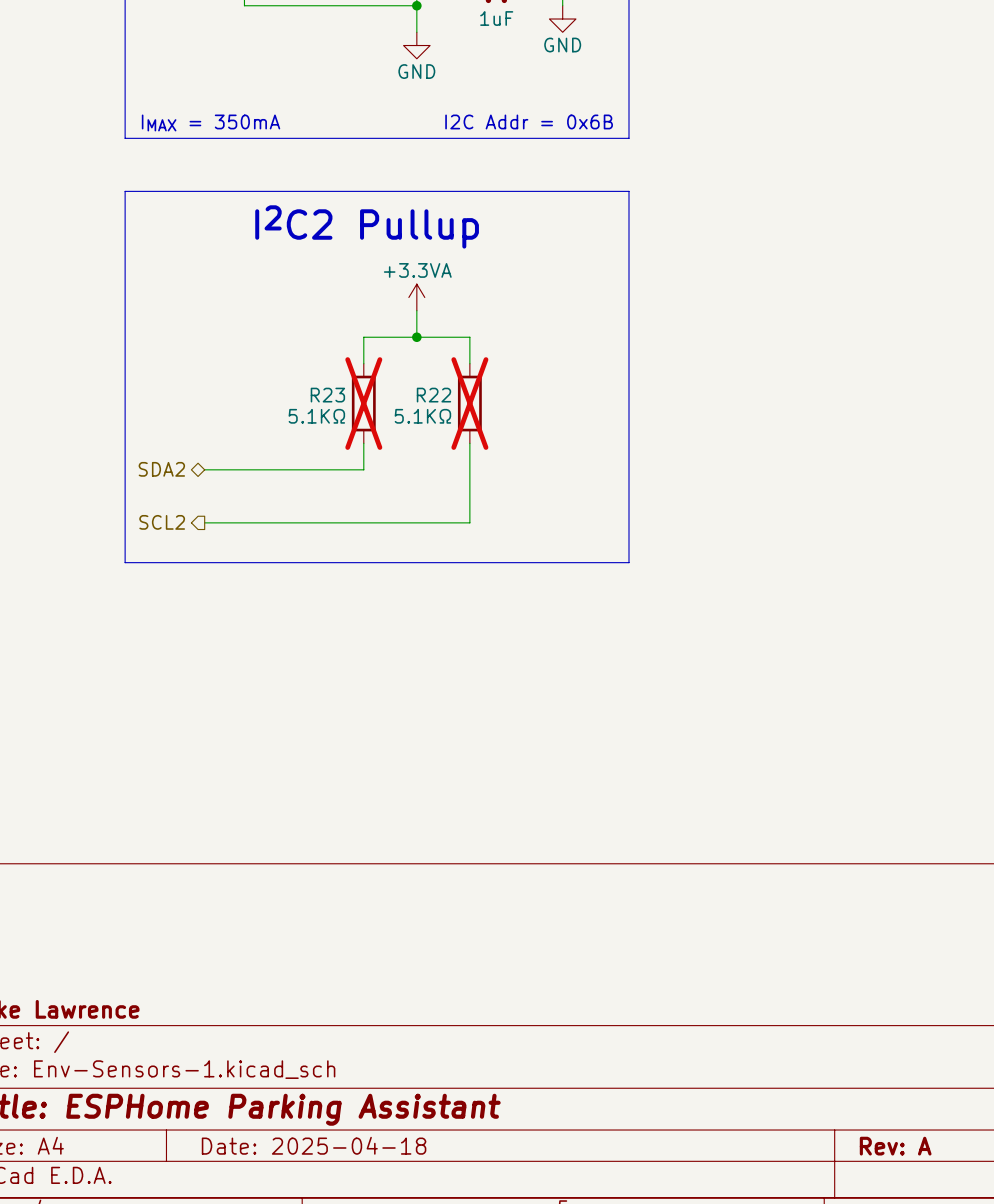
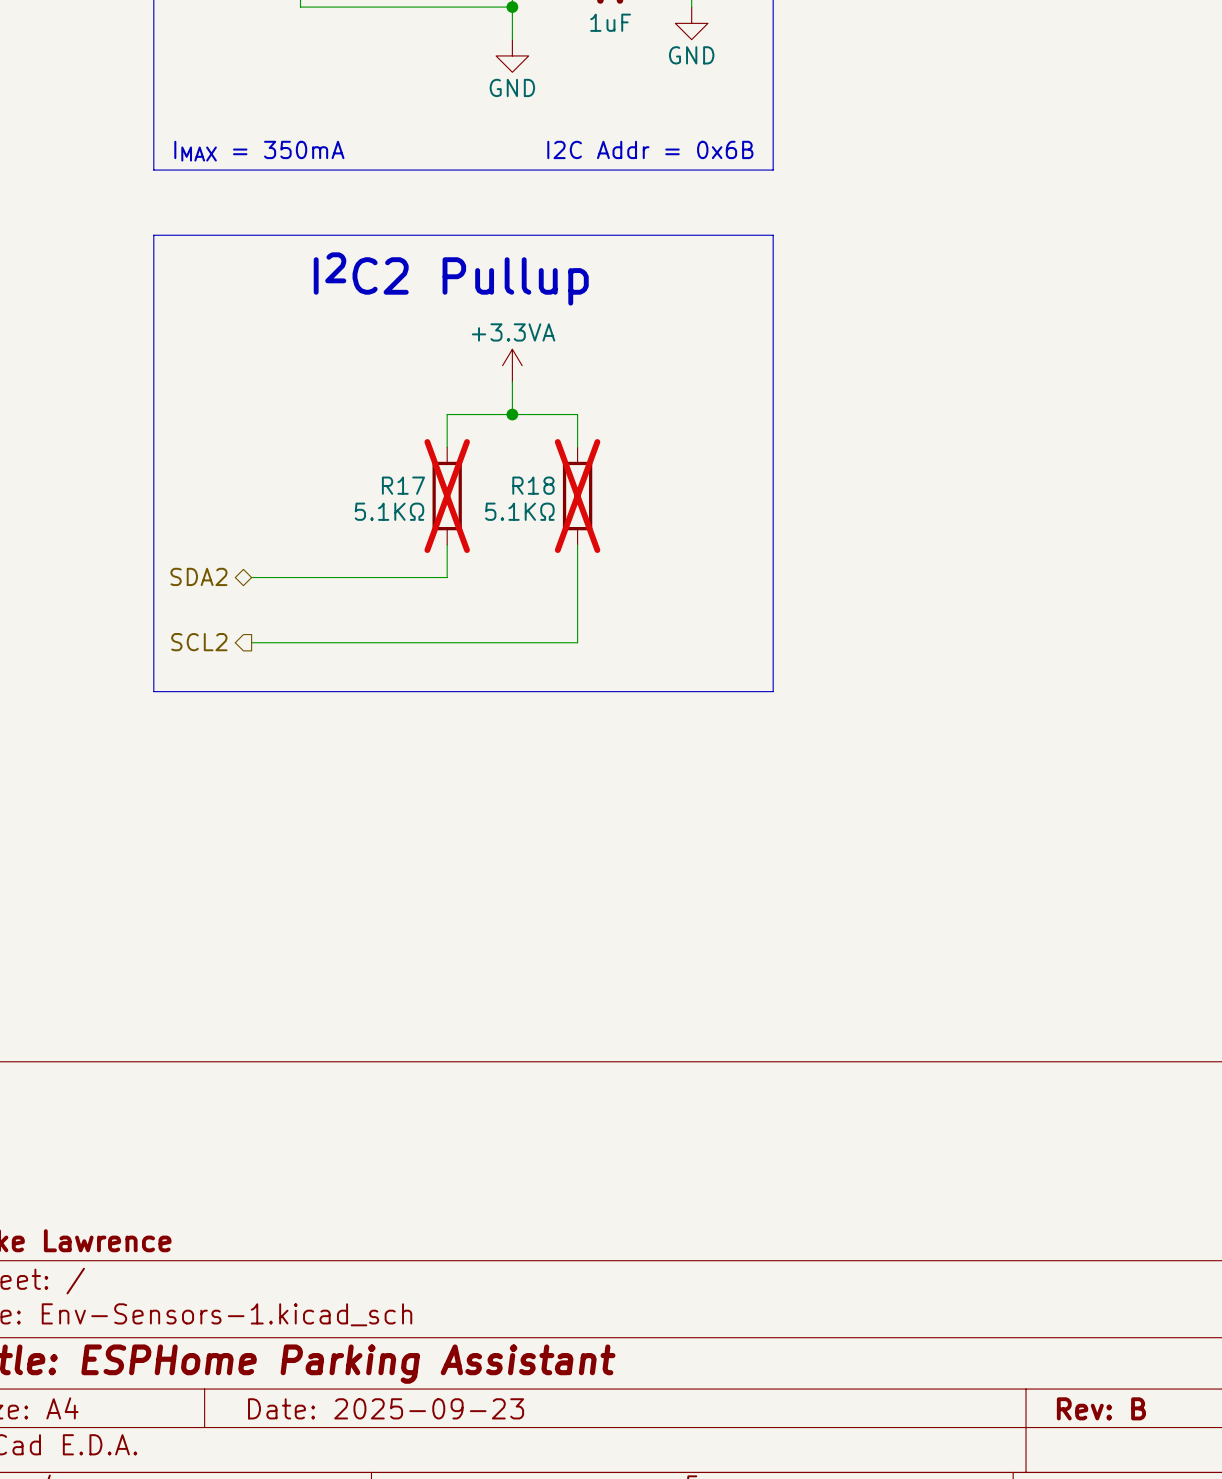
R23 name: R23 (327, 395) -> R17 (403, 485)
R22 name: R22 (433, 395) -> R18 (533, 485)
title block: Date: 2025-04-18 (314, 1145) -> Date: 2025-09-23 (386, 1408)
title block: Rev: A (895, 1146) -> Rev: B (1101, 1408)

